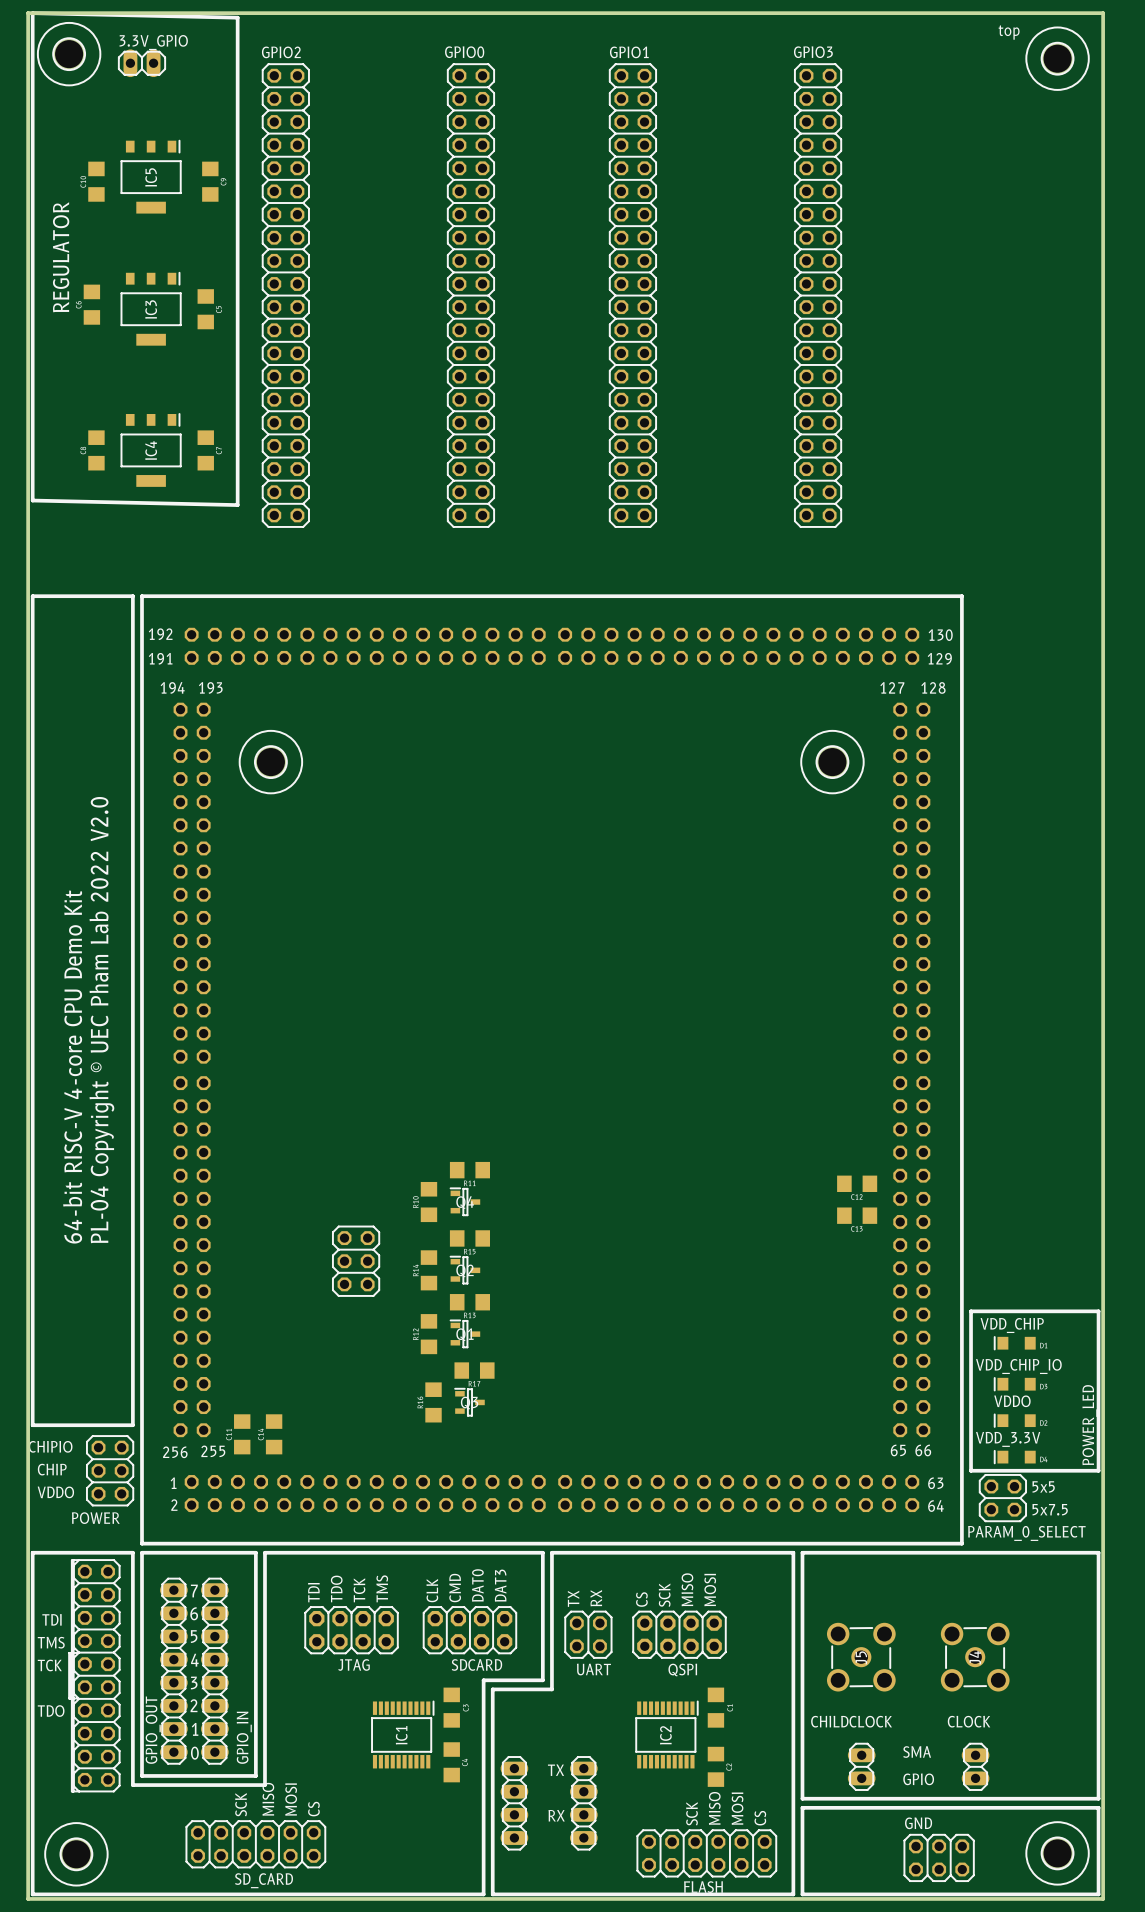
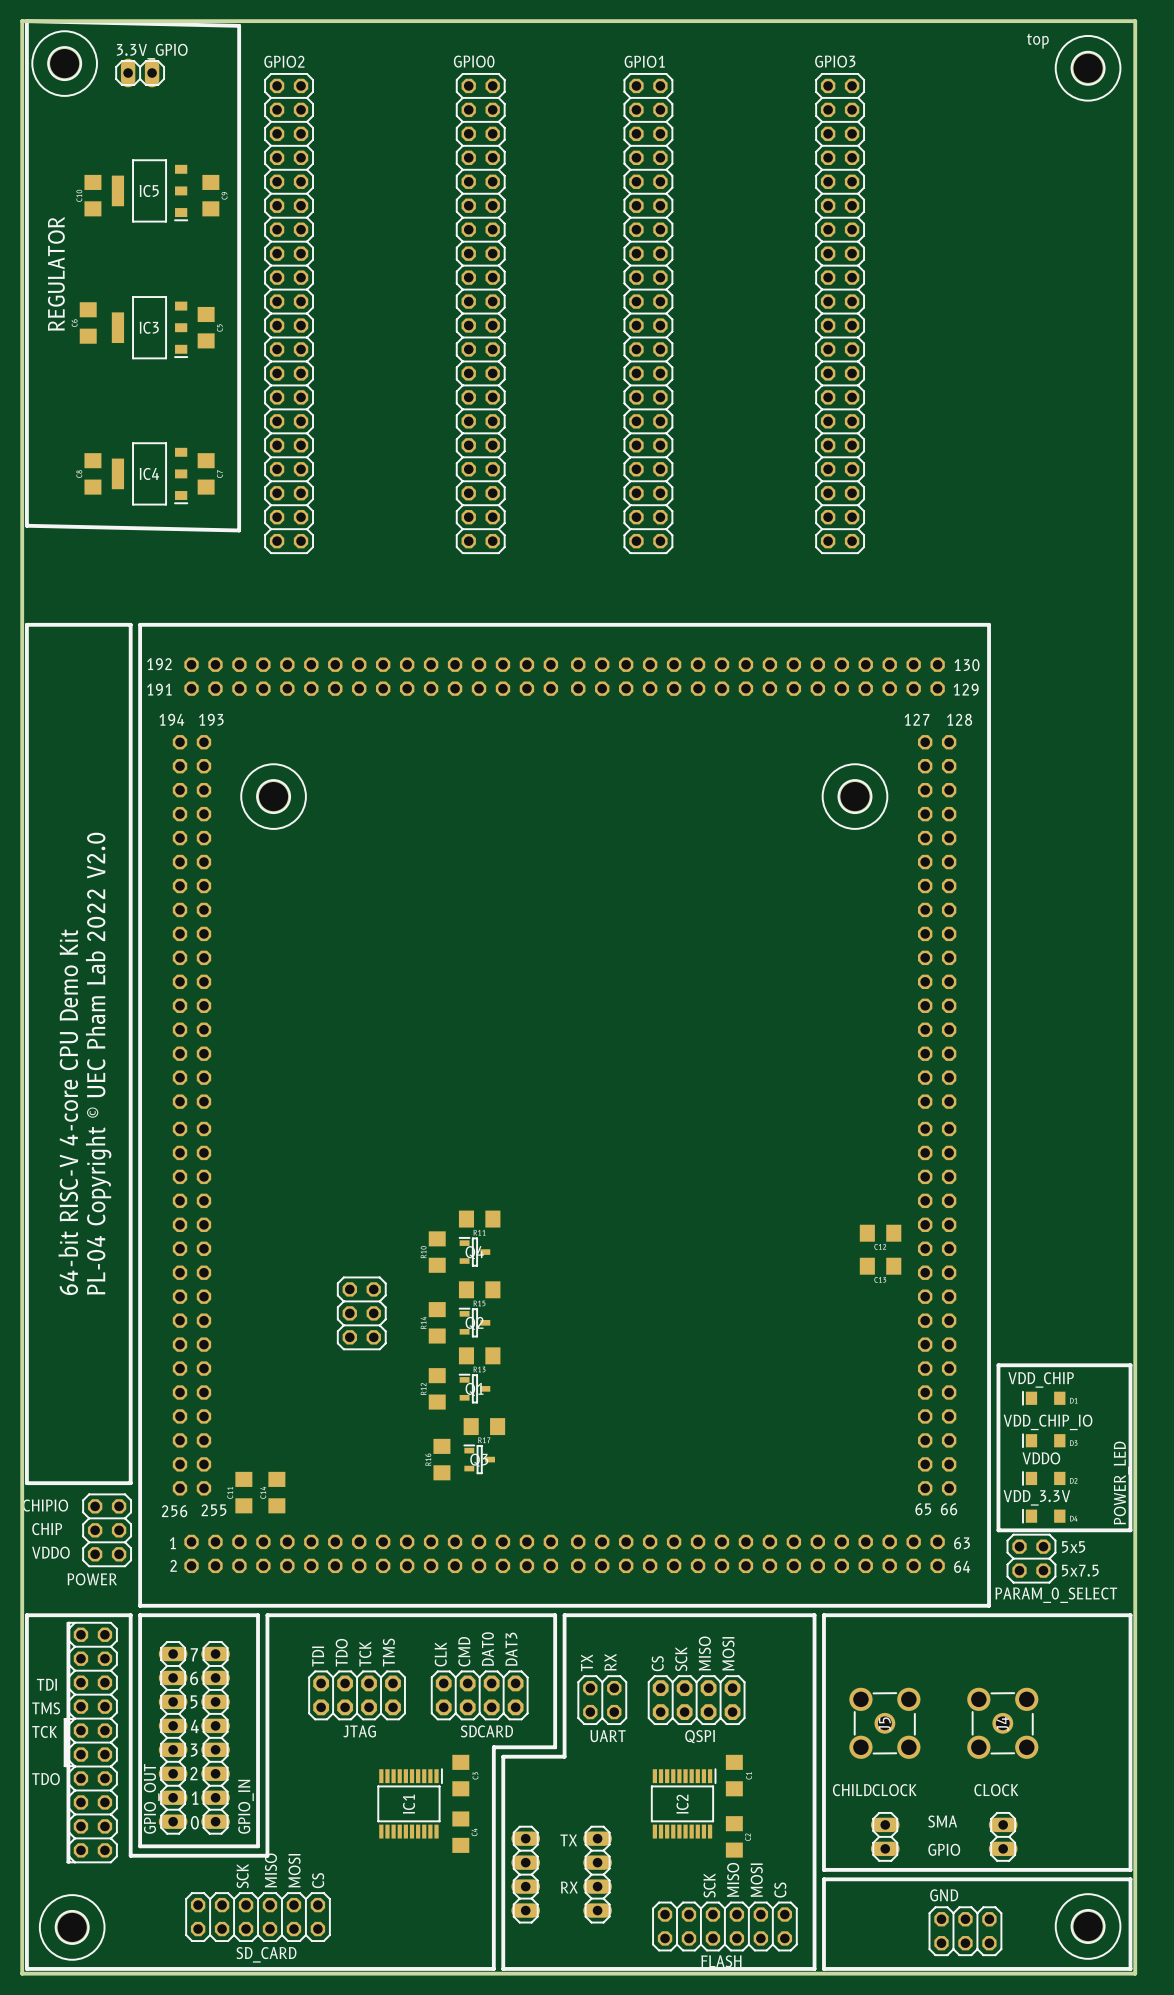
IC5 rotation: 0° (151, 176) -> 90° clockwise (150, 190)
IC3 rotation: 0° (151, 308) -> 90° clockwise (150, 327)
IC4 rotation: 0° (151, 449) -> 90° clockwise (150, 473)

